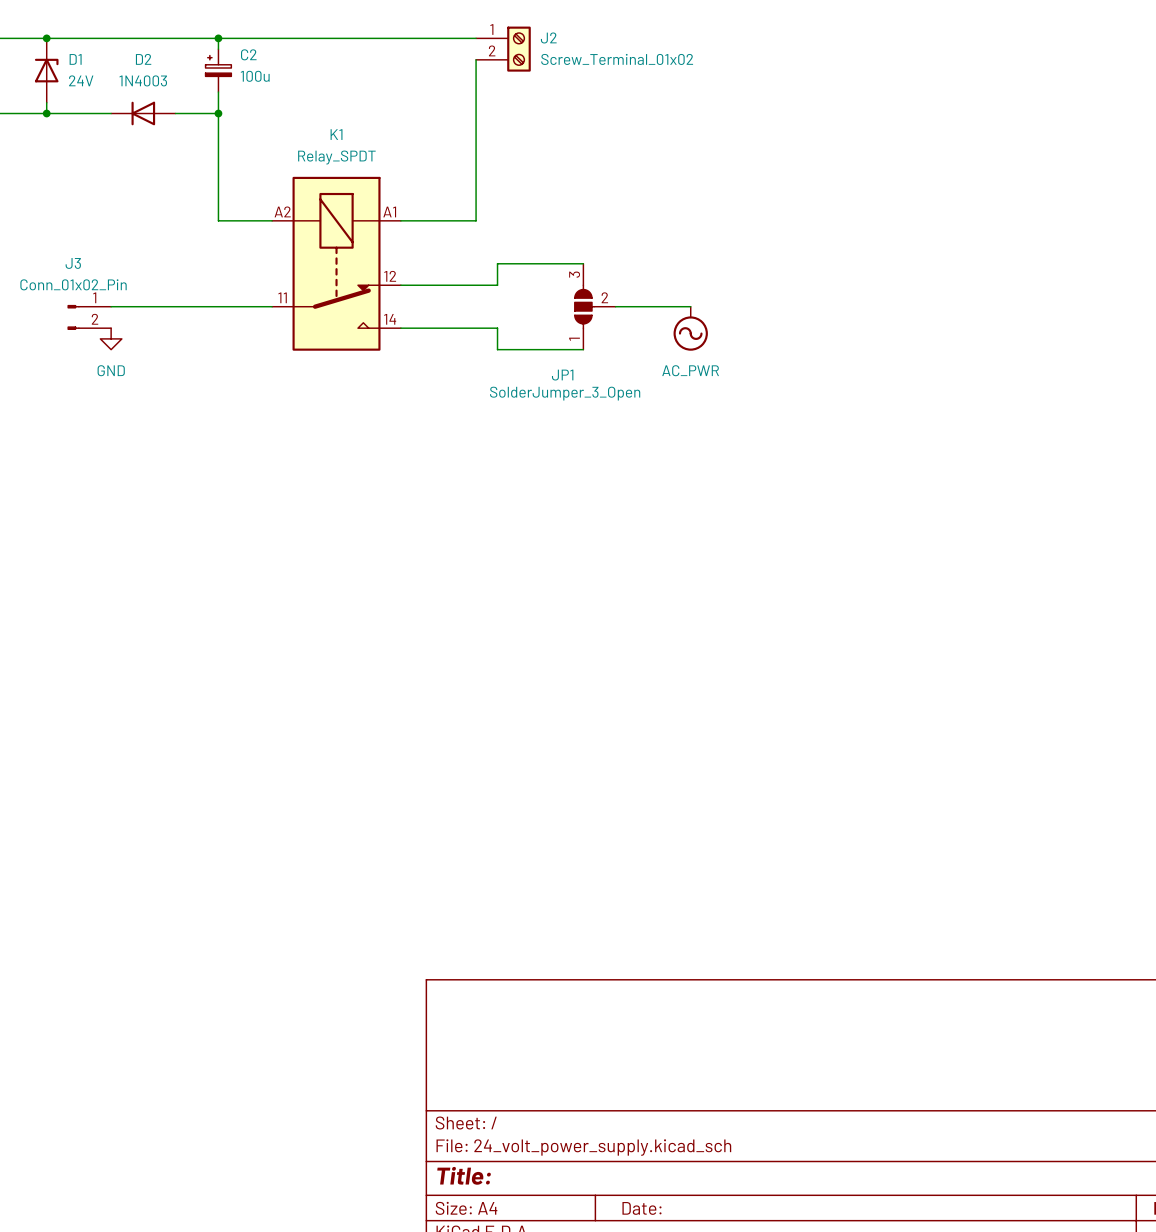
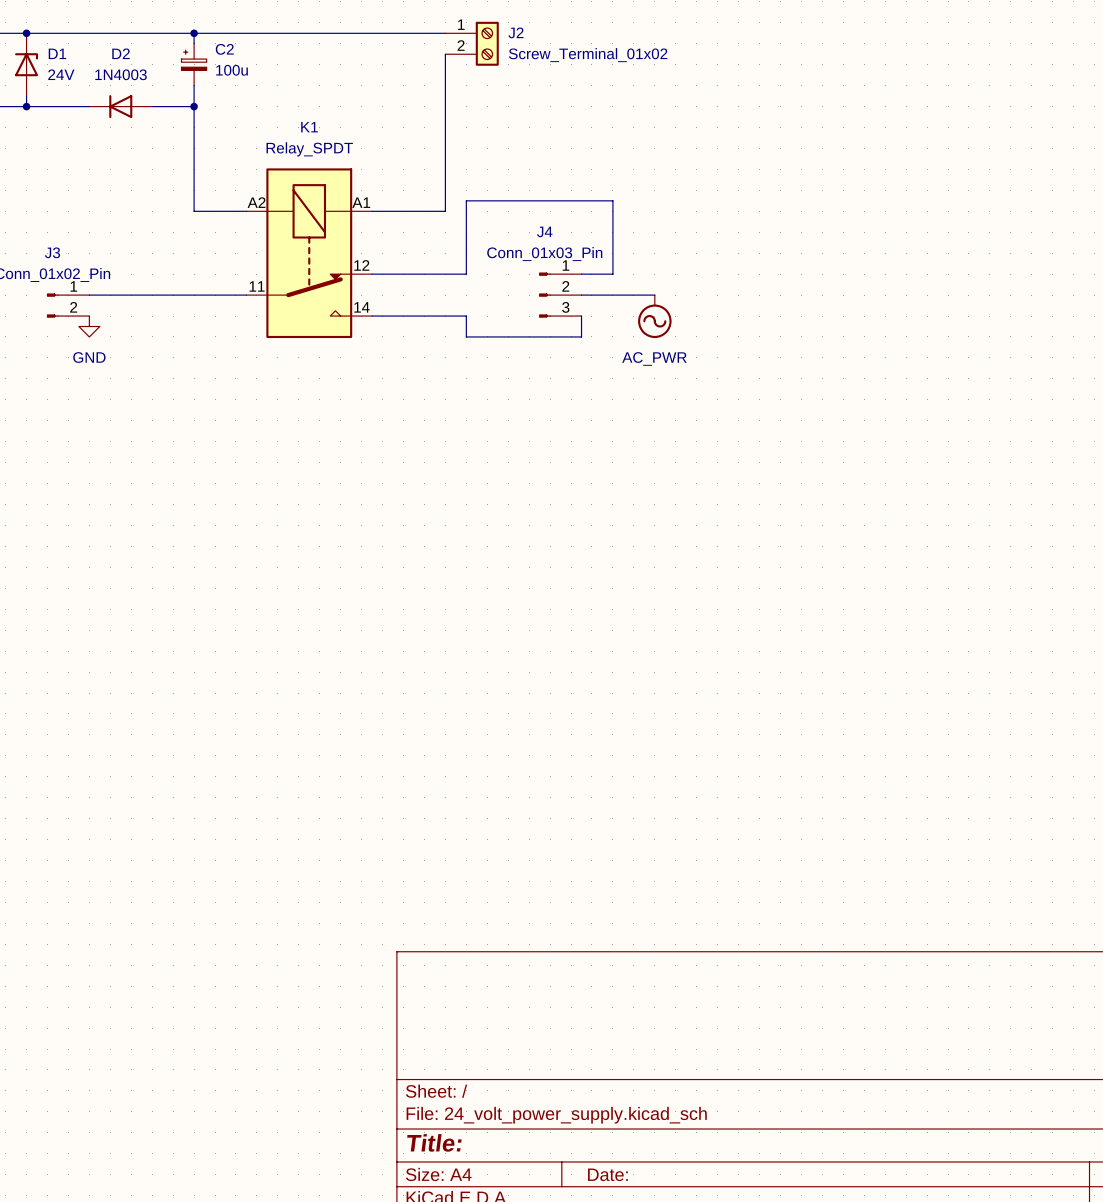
wire: (497, 263) (583, 263) -> (466, 253) (466, 200) (612, 200) (612, 274) (581, 274)
J4: none -> Conn_01x03_Pin (560, 295)
JP1: SolderJumper_3_Open (595, 306) -> none
wire: none -> (581, 316) (581, 336) (550, 336)

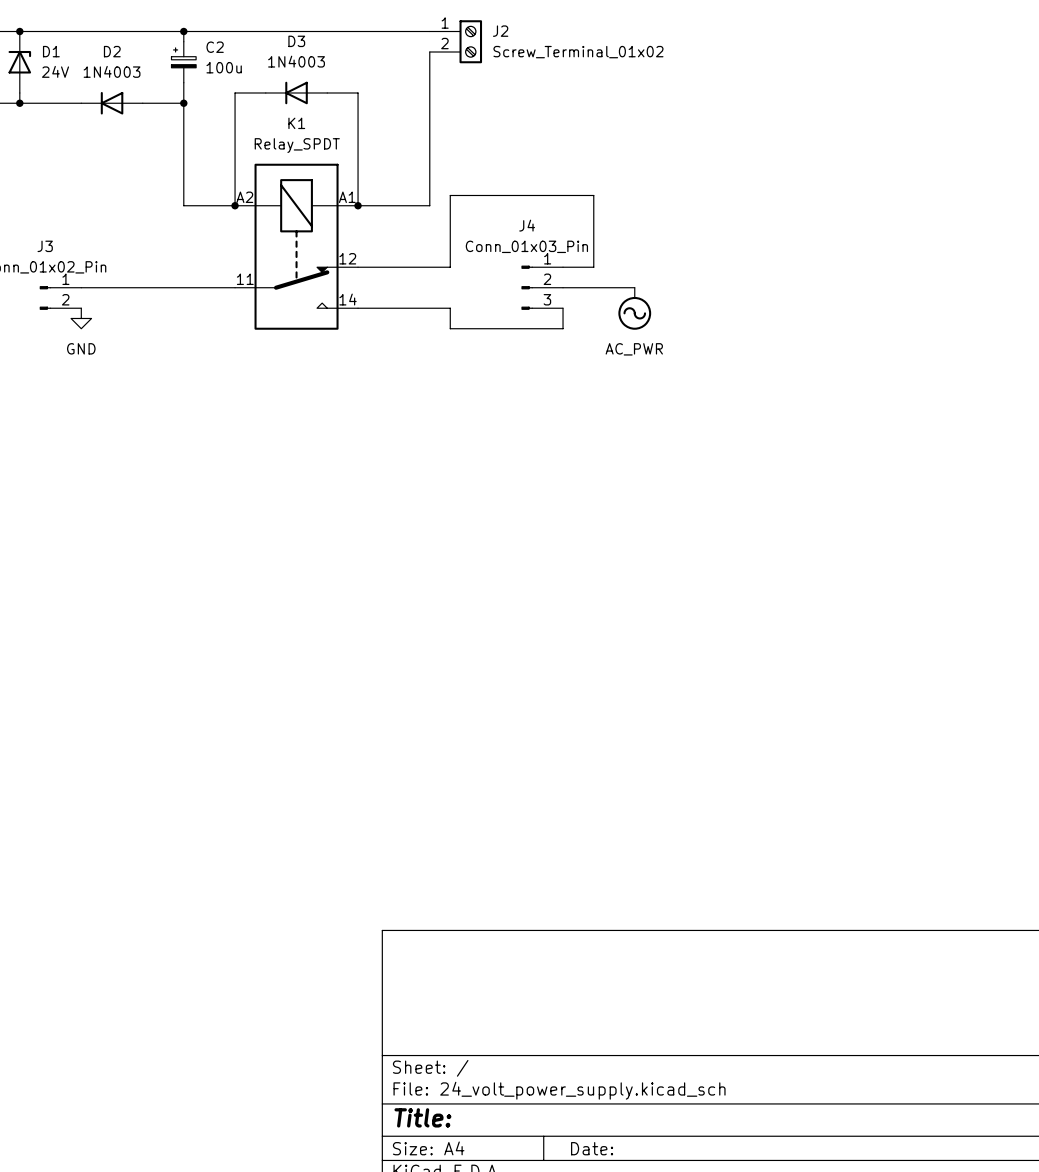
wire: none -> (265, 92) (235, 92) (235, 205)
D3: none -> 1N4003 (296, 92)
wire: none -> (327, 92) (358, 92) (358, 205)
junction: none -> (235, 205)
junction: none -> (358, 205)

